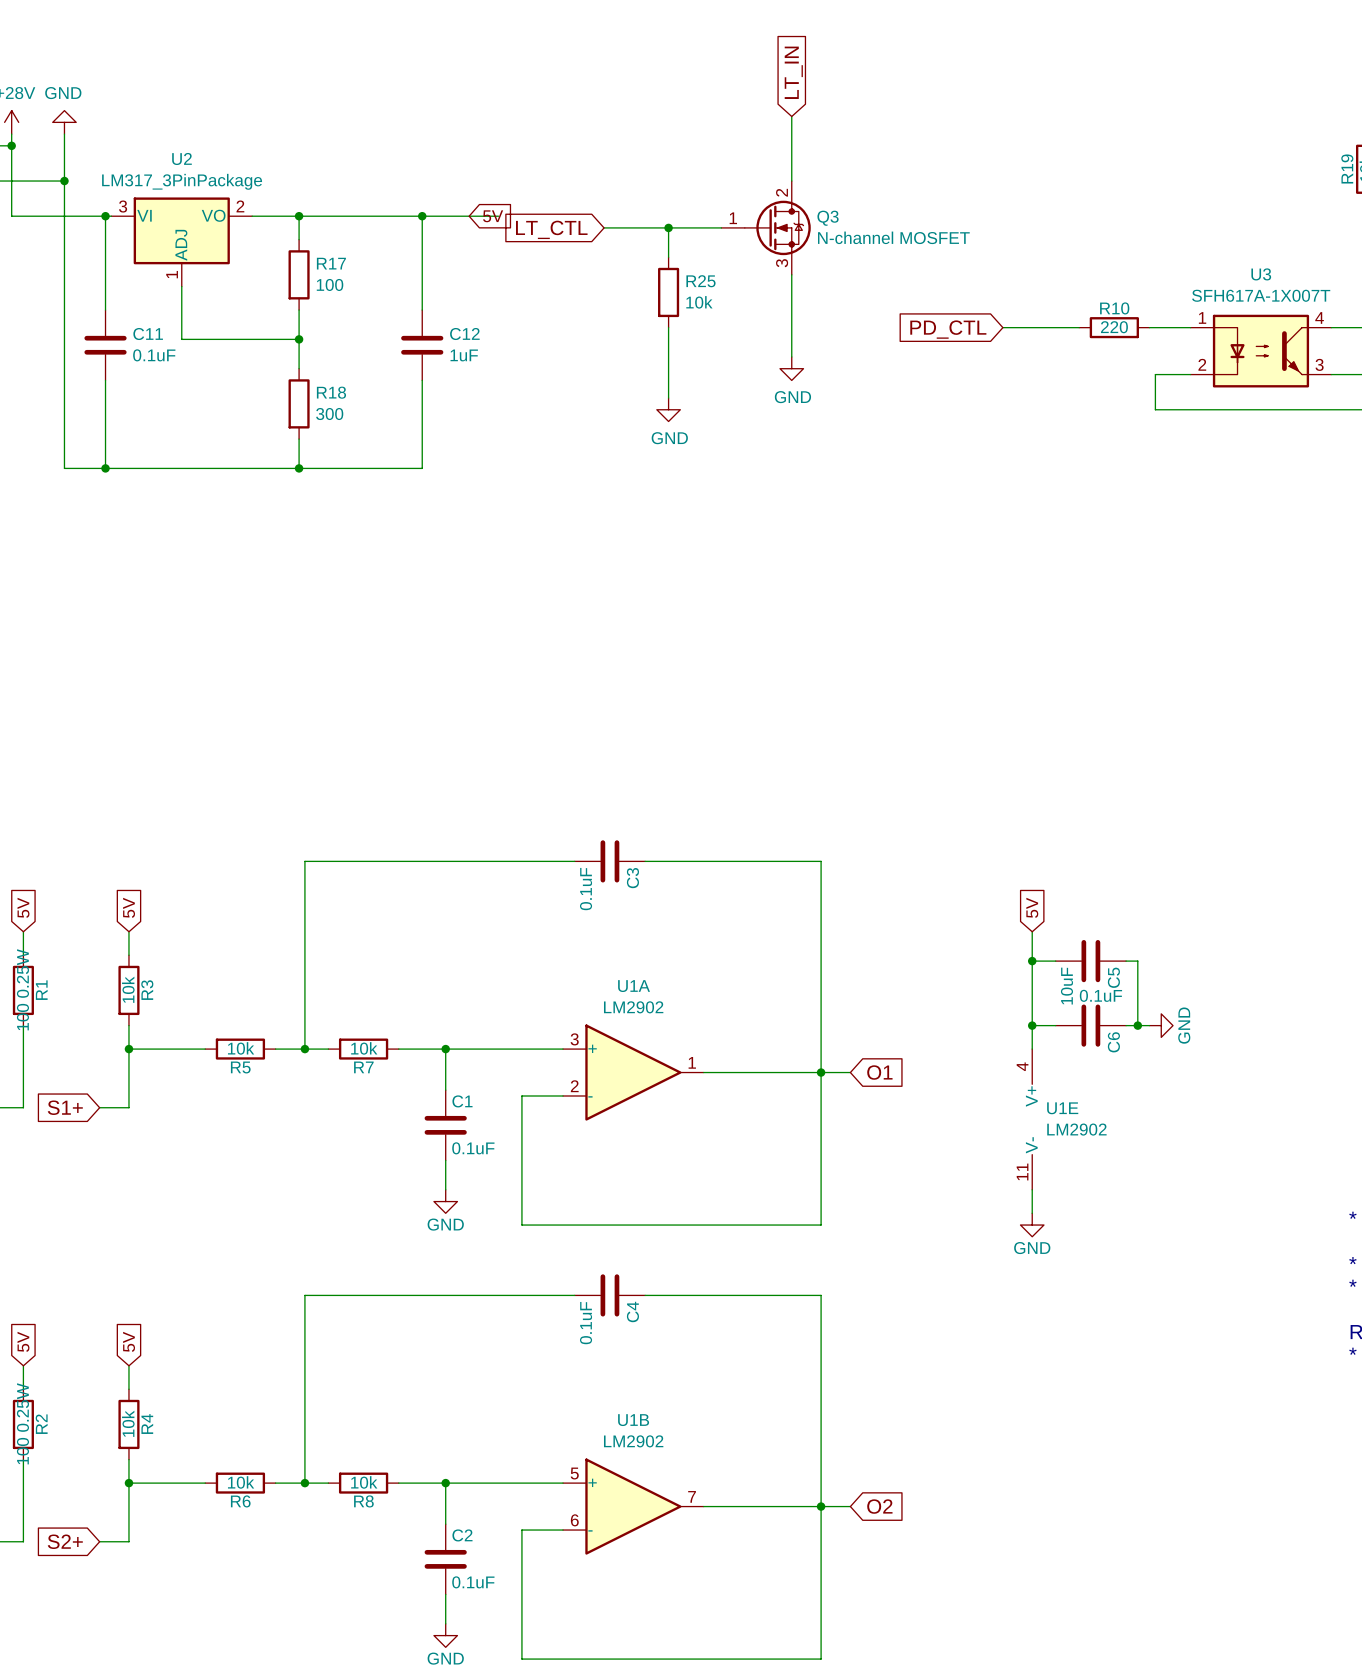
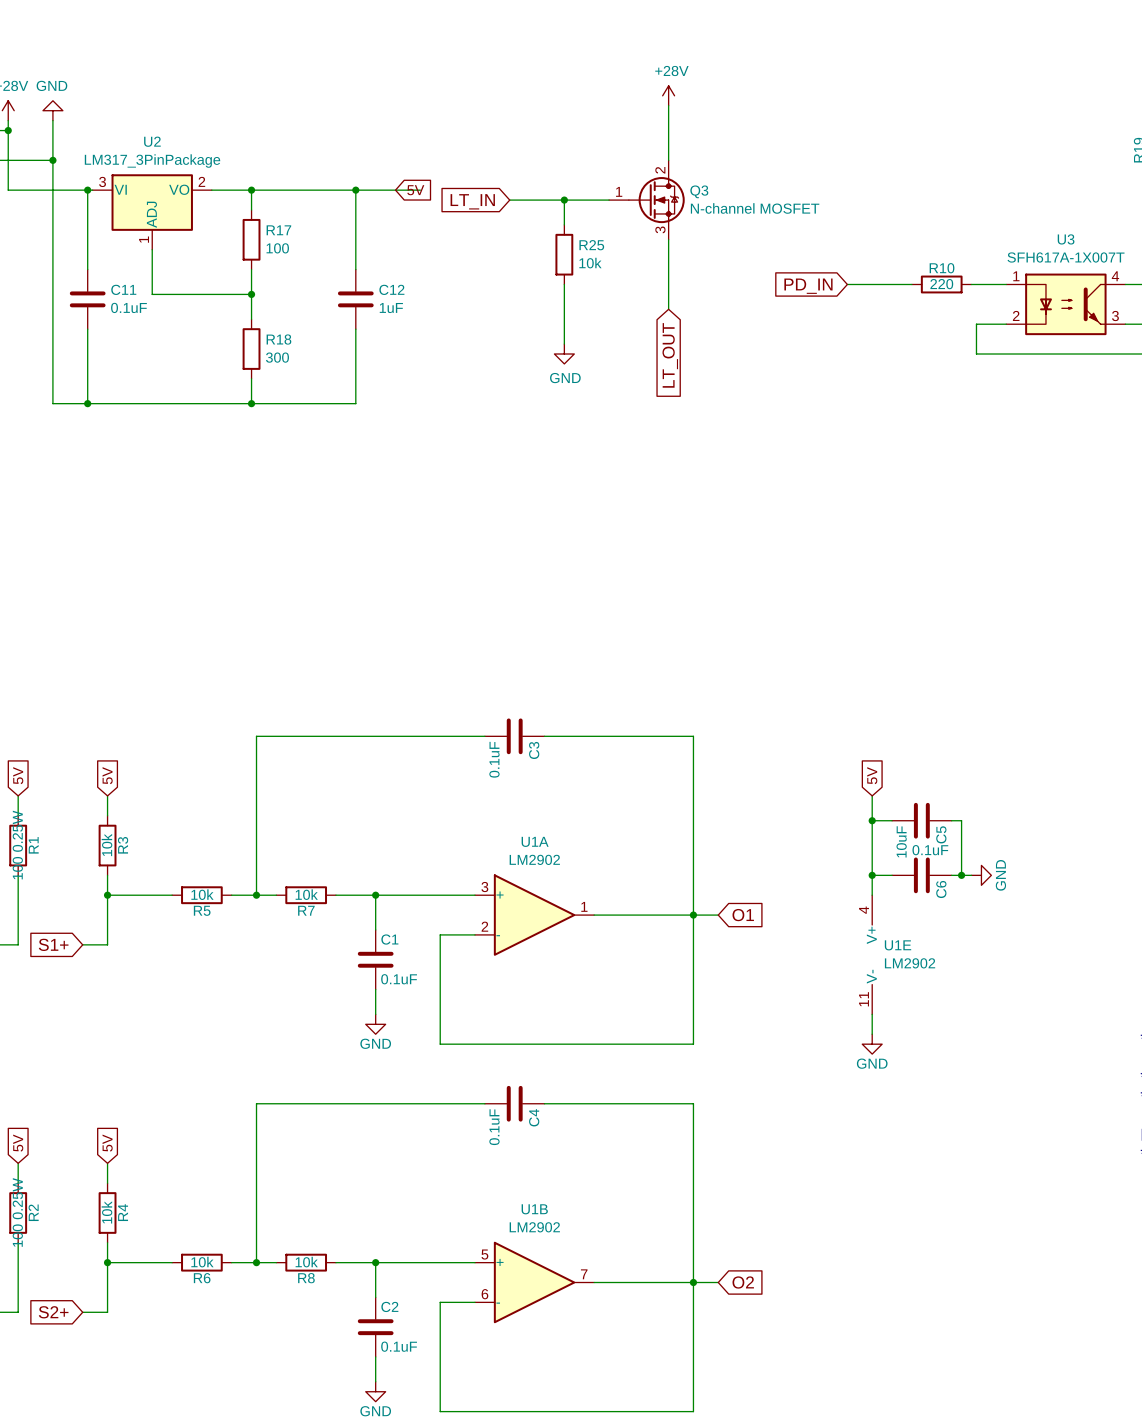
global label: LT_IN (793, 72) -> none
power symbol: none -> +28V (668, 95)
global label: LT_CTL (551, 229) -> LT_IN (472, 201)
global label: PD_CTL (948, 329) -> PD_IN (808, 286)
power symbol: GND (791, 368) -> none
global label: none -> LT_OUT (670, 355)

